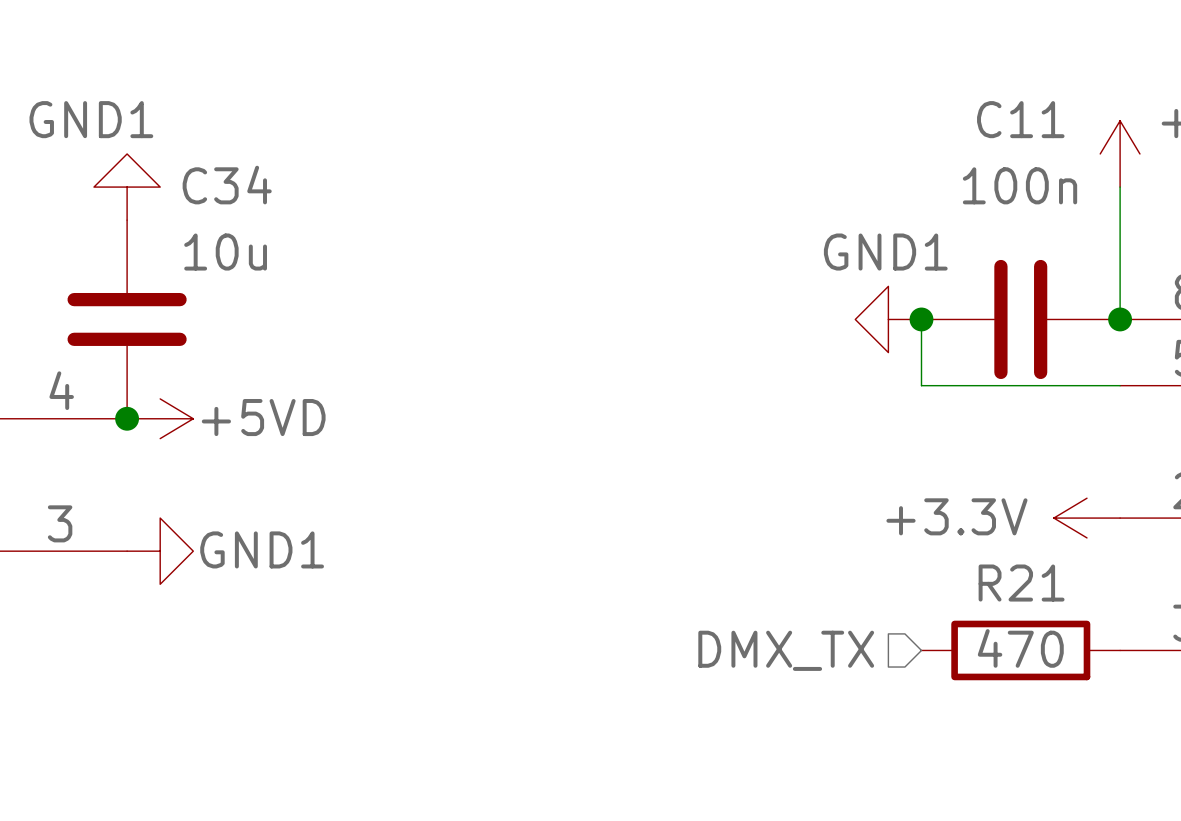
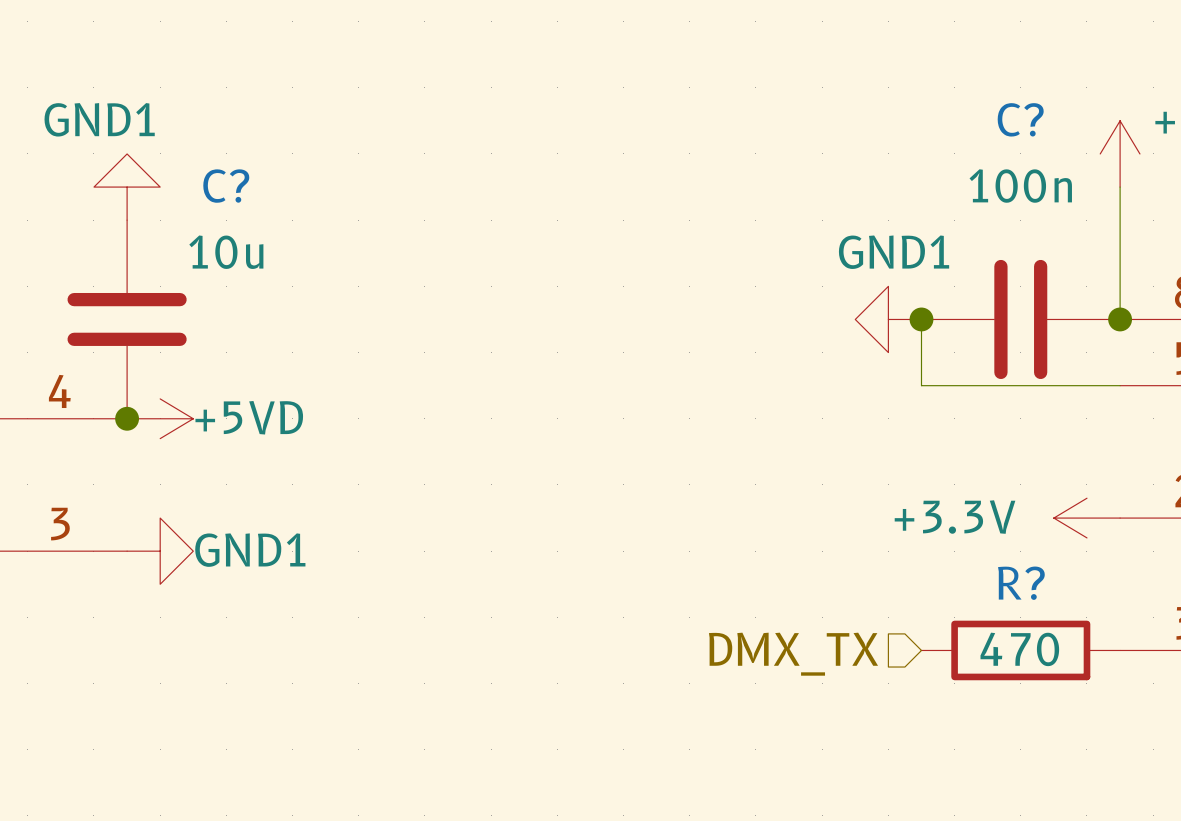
C11 name: C11 (1020, 119) -> C? (1020, 119)
C34 name: C34 (227, 185) -> C? (226, 186)
R21 name: R21 (1021, 583) -> R? (1021, 583)

